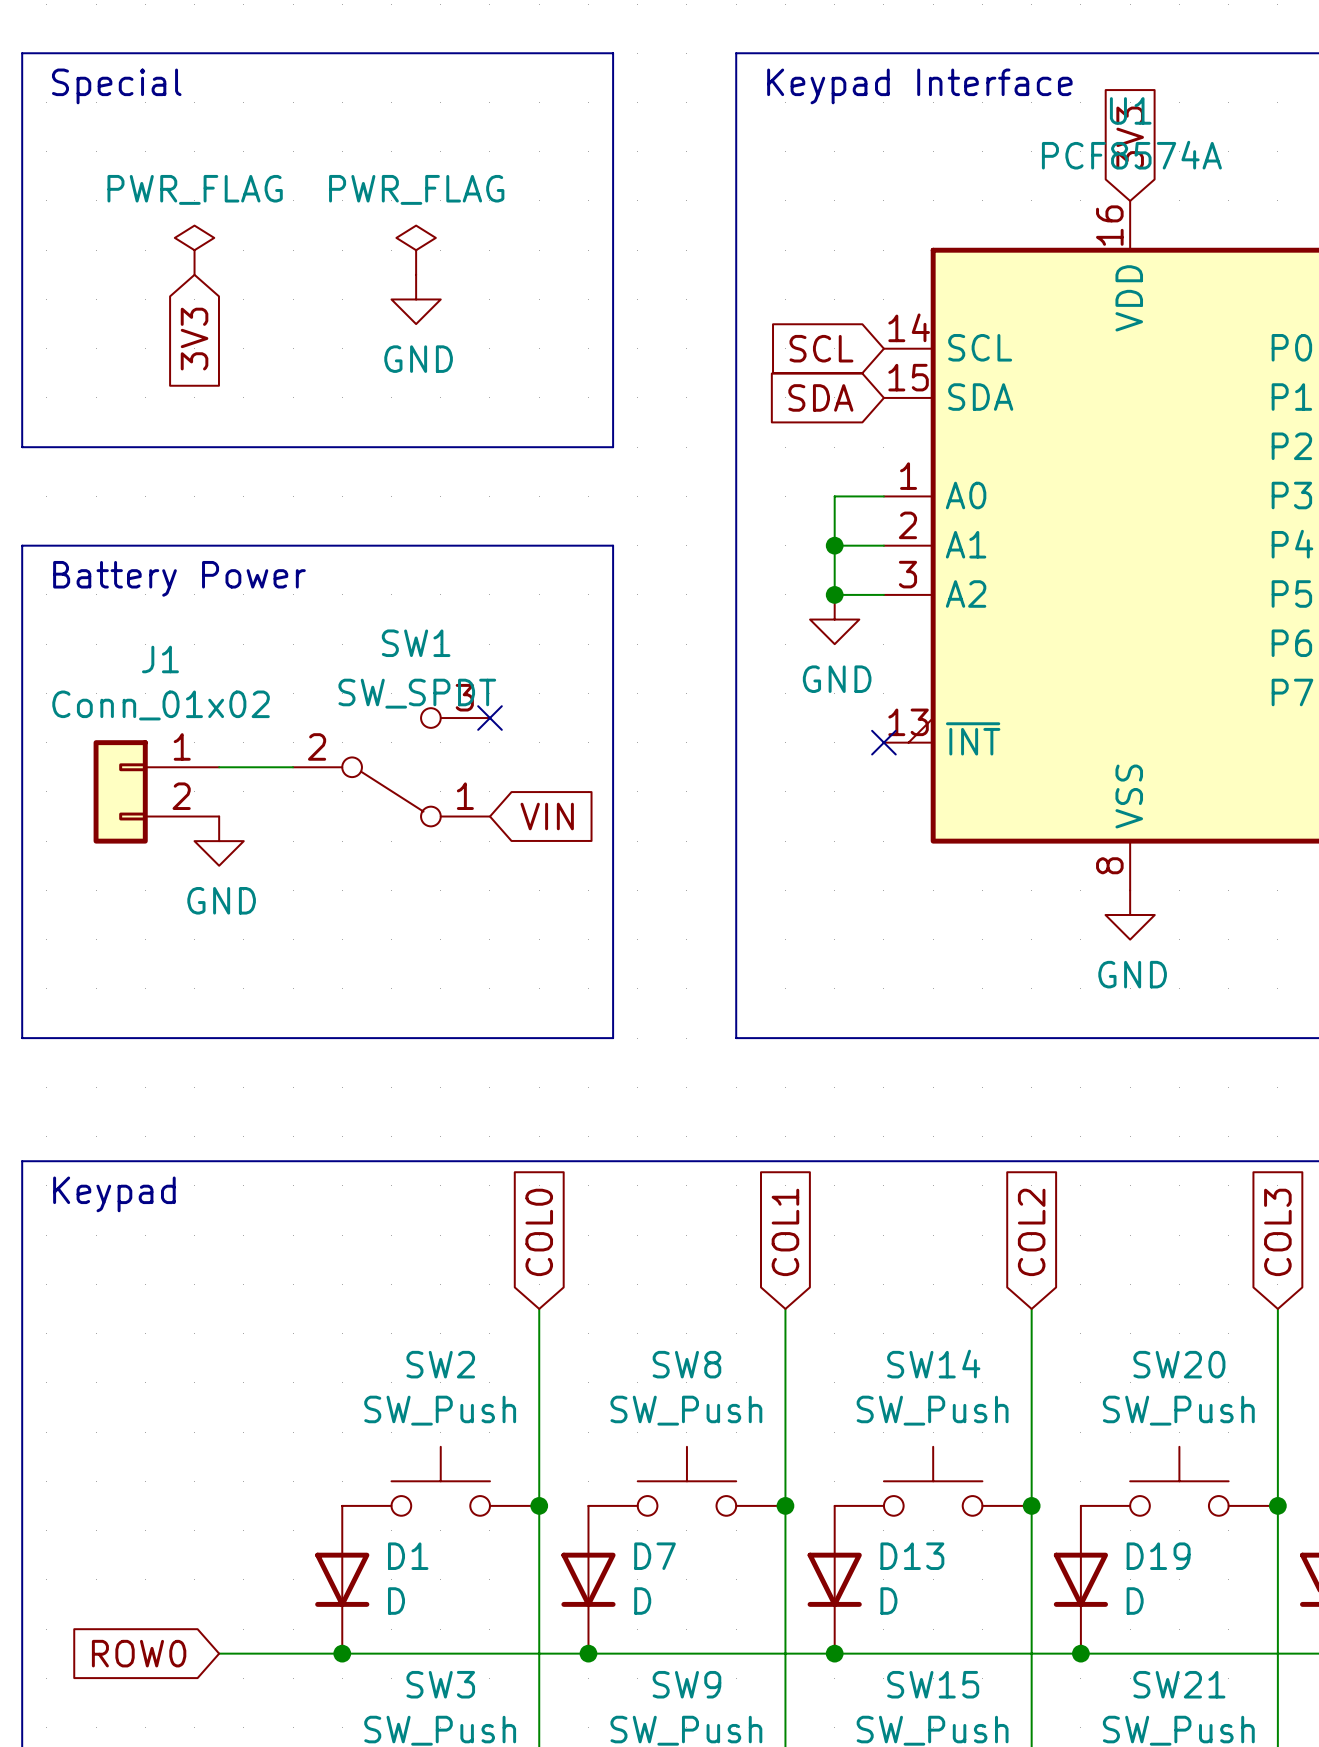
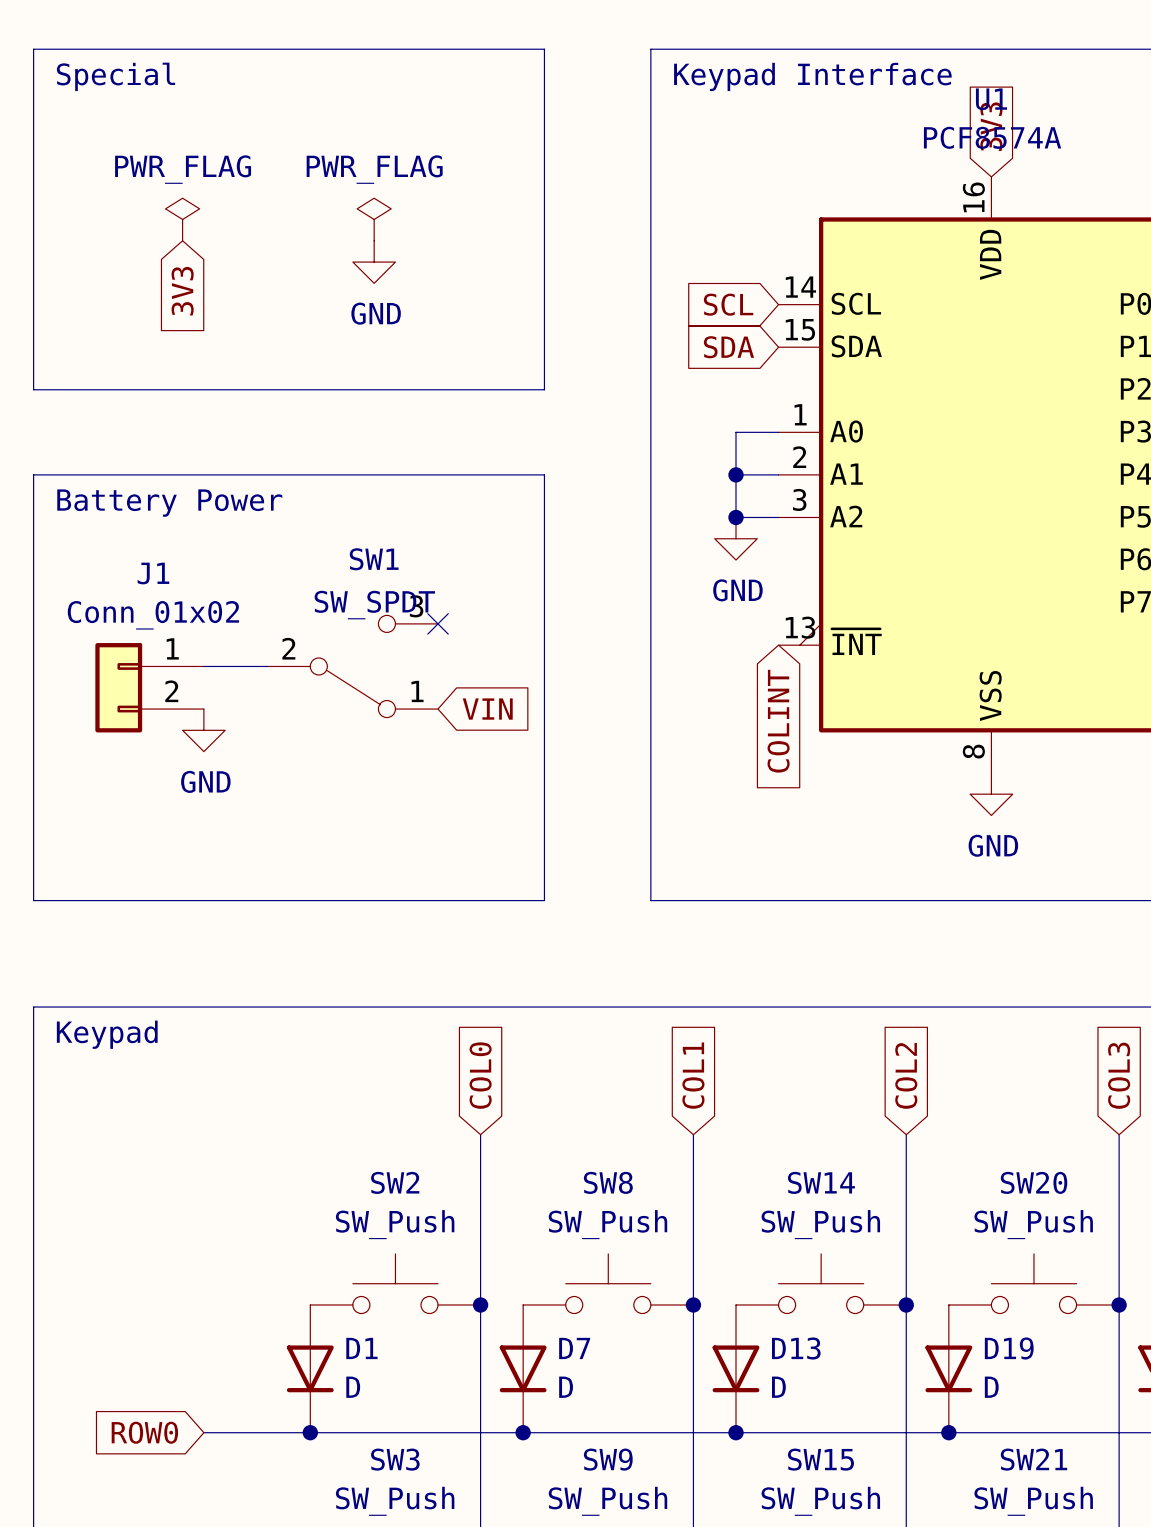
no-connect mark: (883, 742) -> none
global label: none -> COLINT (778, 721)

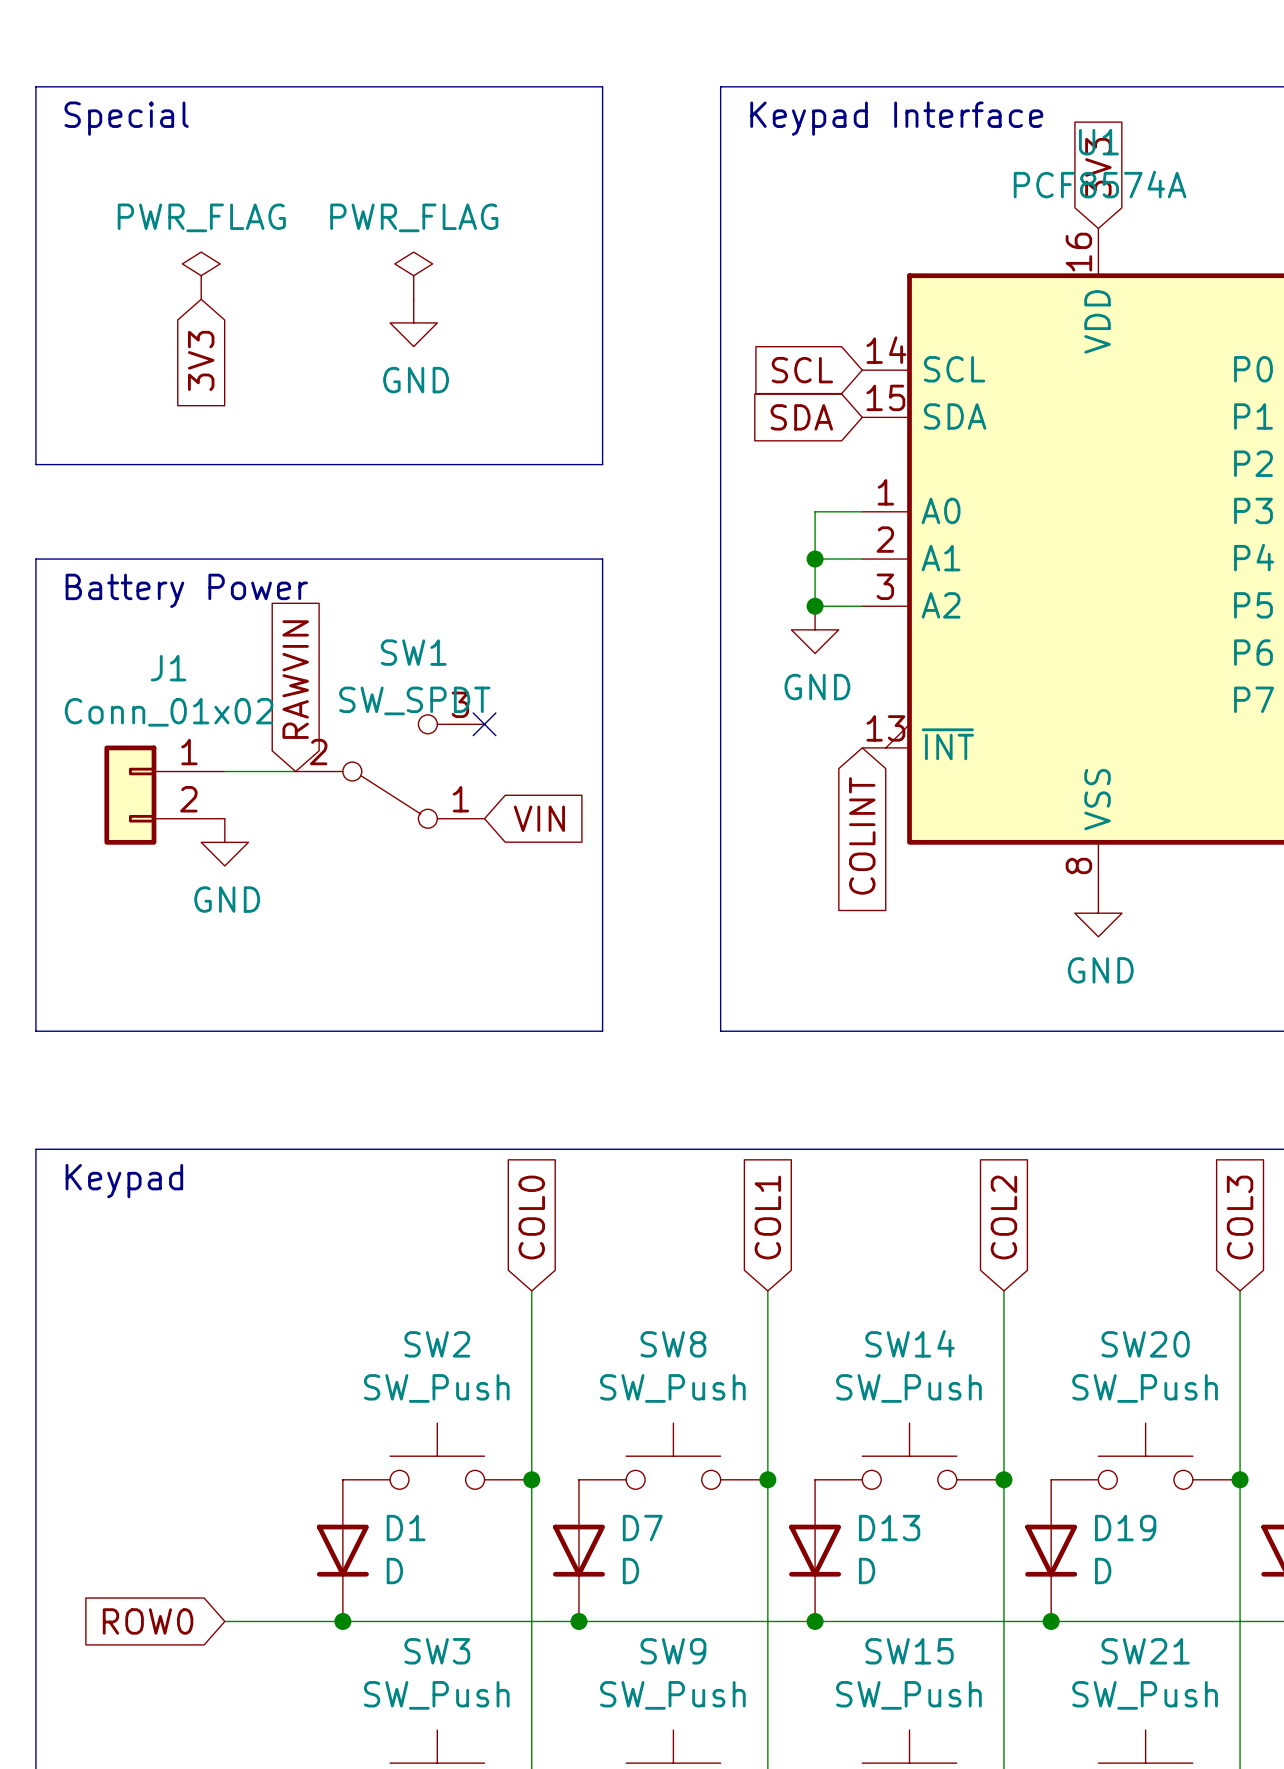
global label: none -> RAWVIN (295, 679)

